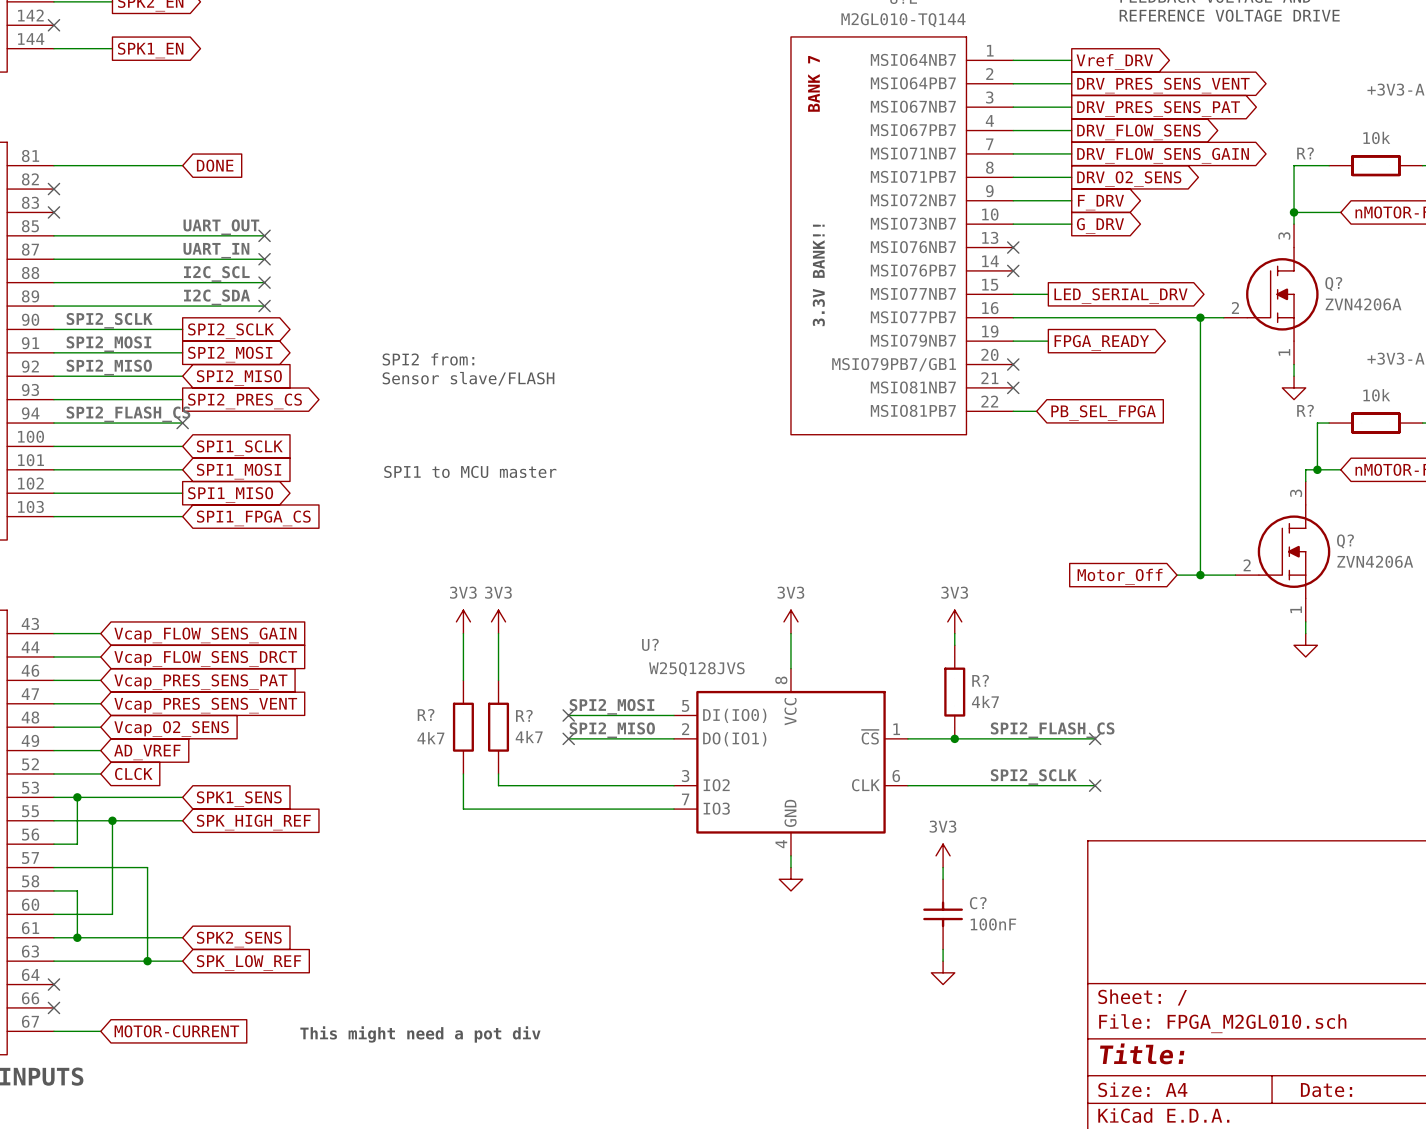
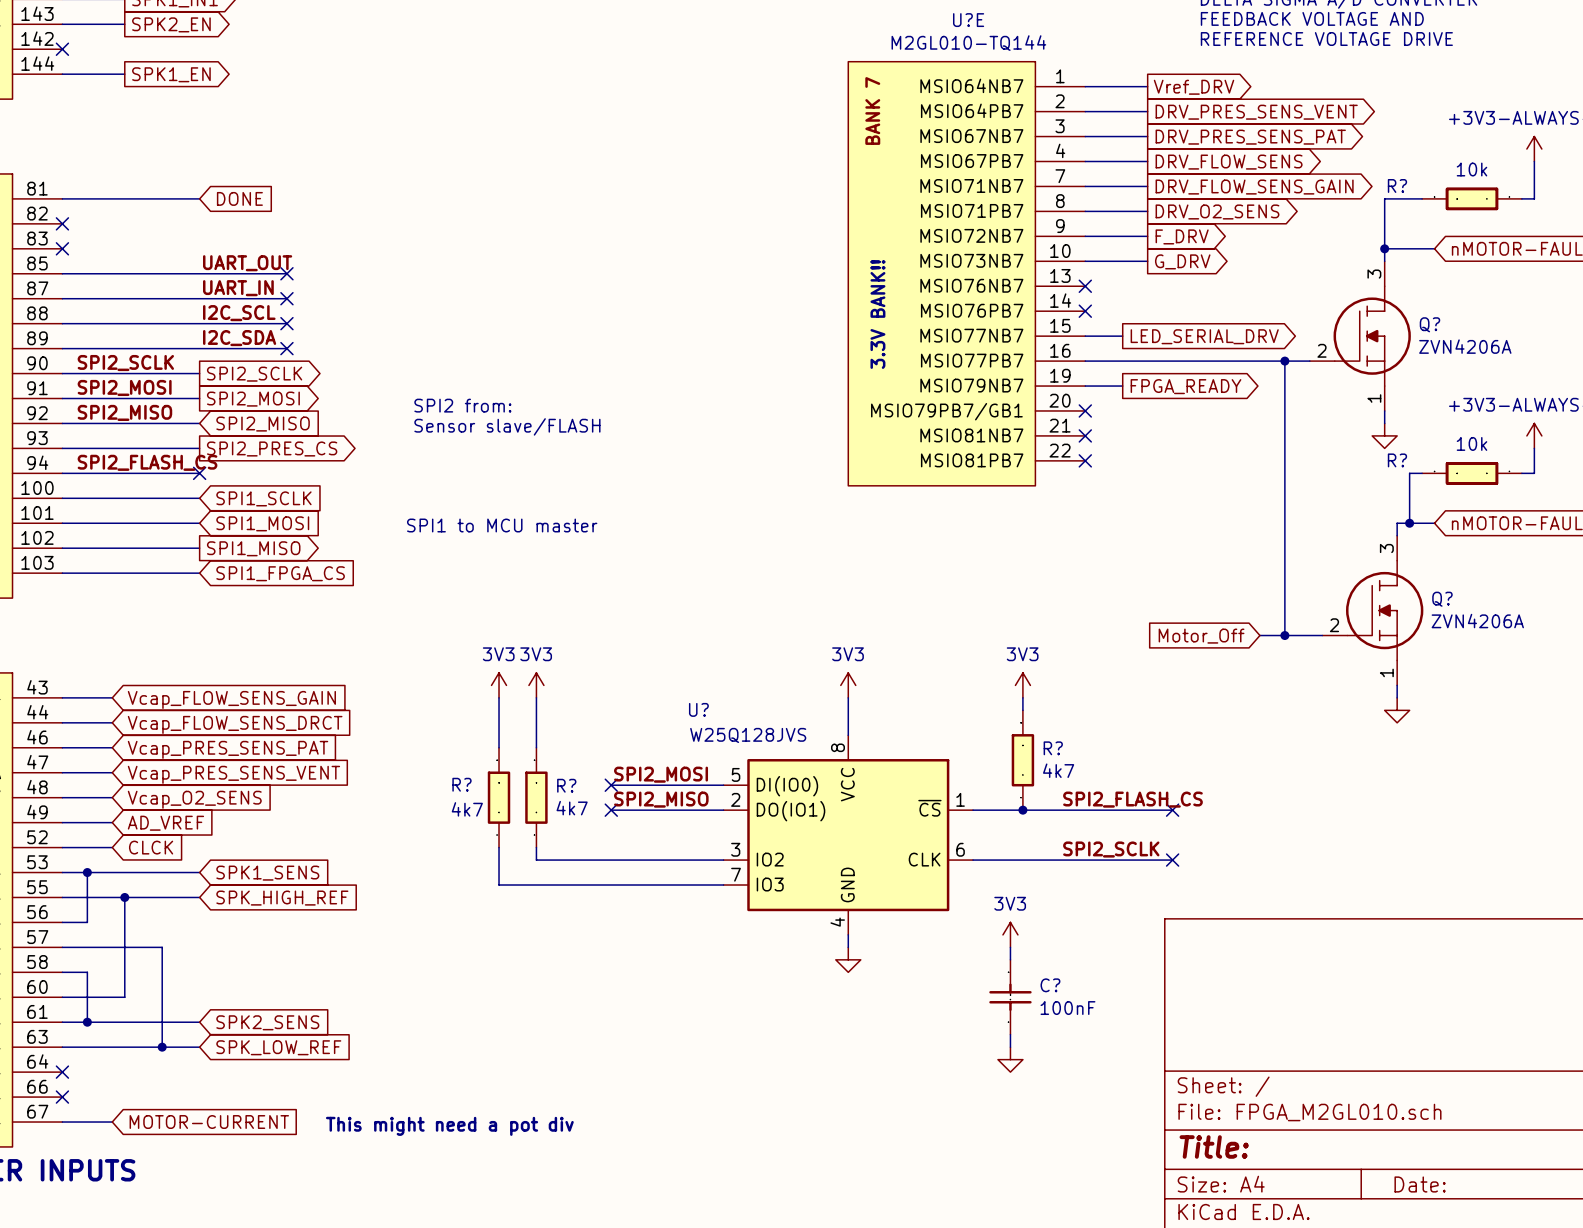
wire: (1013, 411) (1036, 411) -> none
no-connect mark: none -> (1085, 460)
global label: PB_SEL_FPGA (1103, 413) -> none

